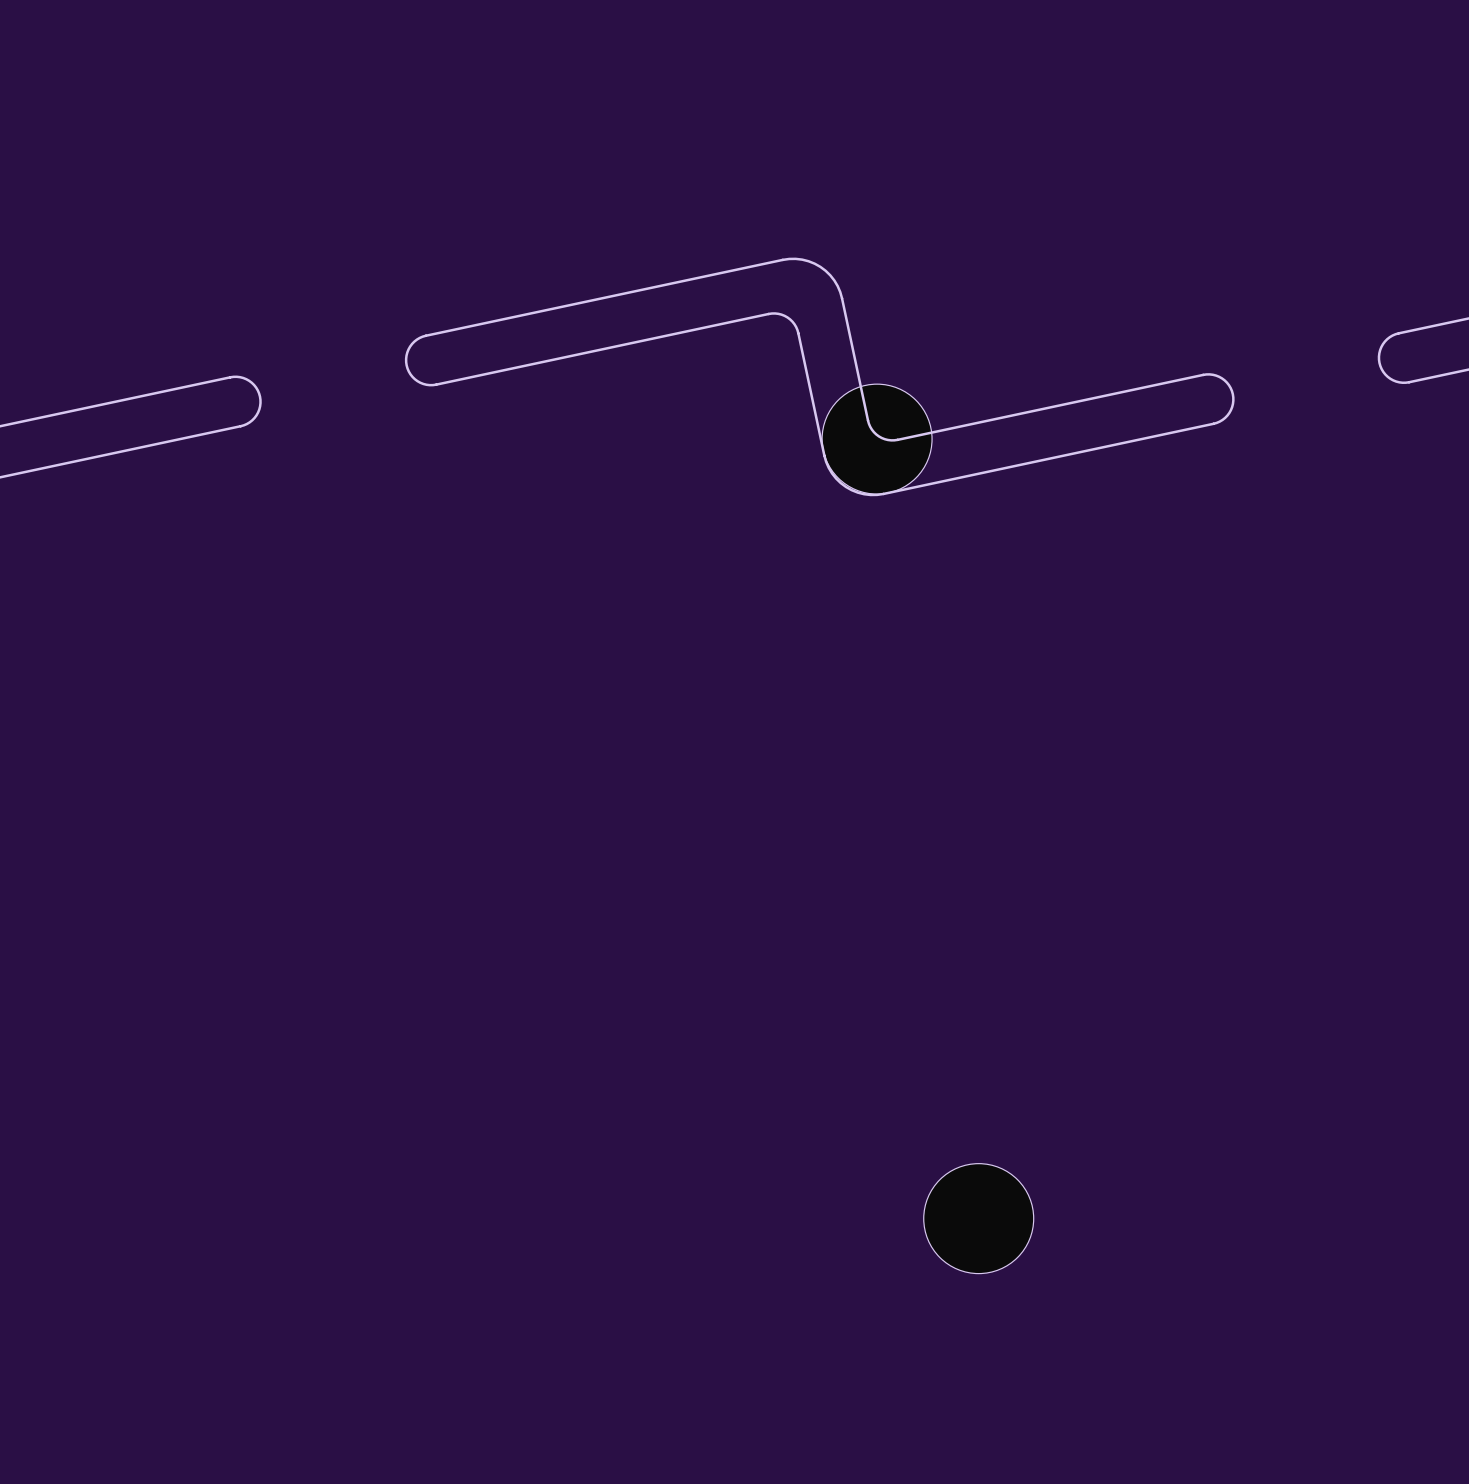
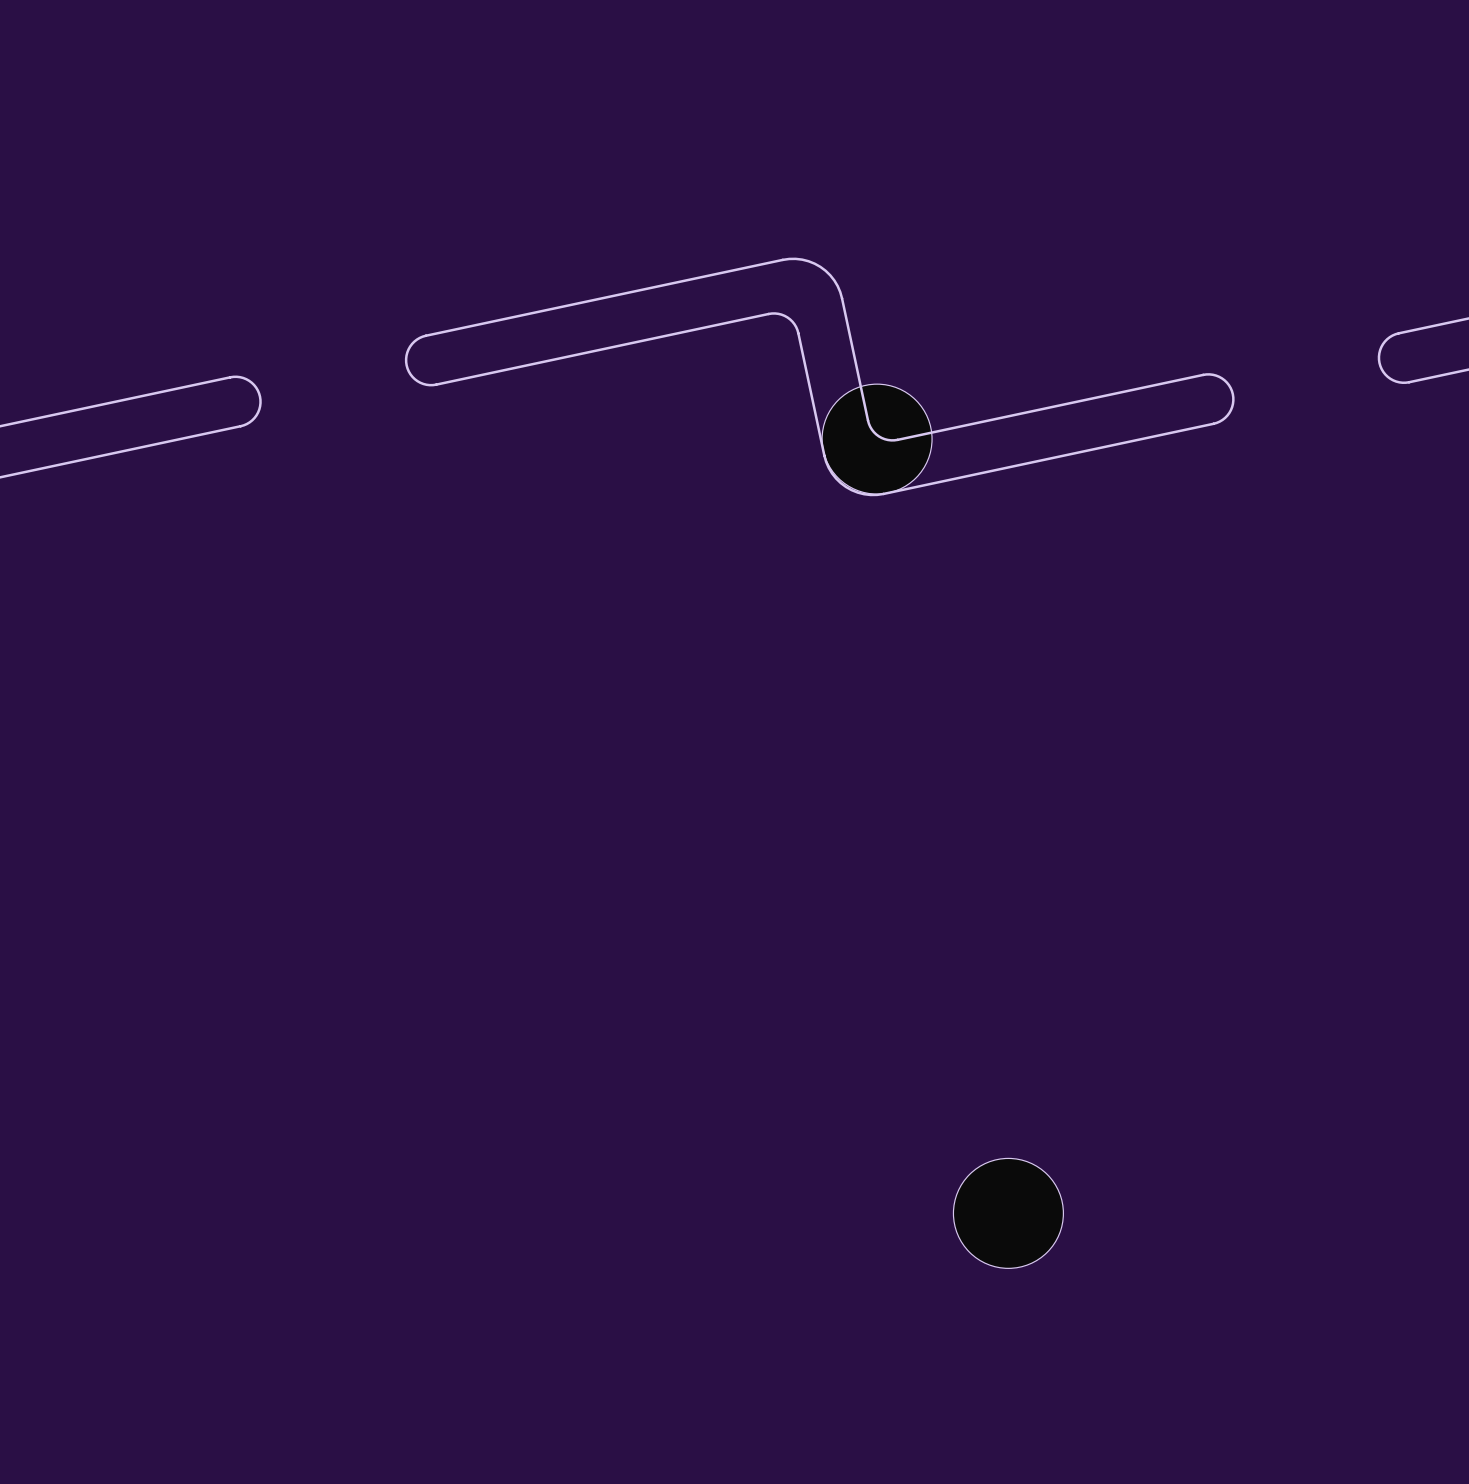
part position: (978, 1218) -> (1008, 1213)

